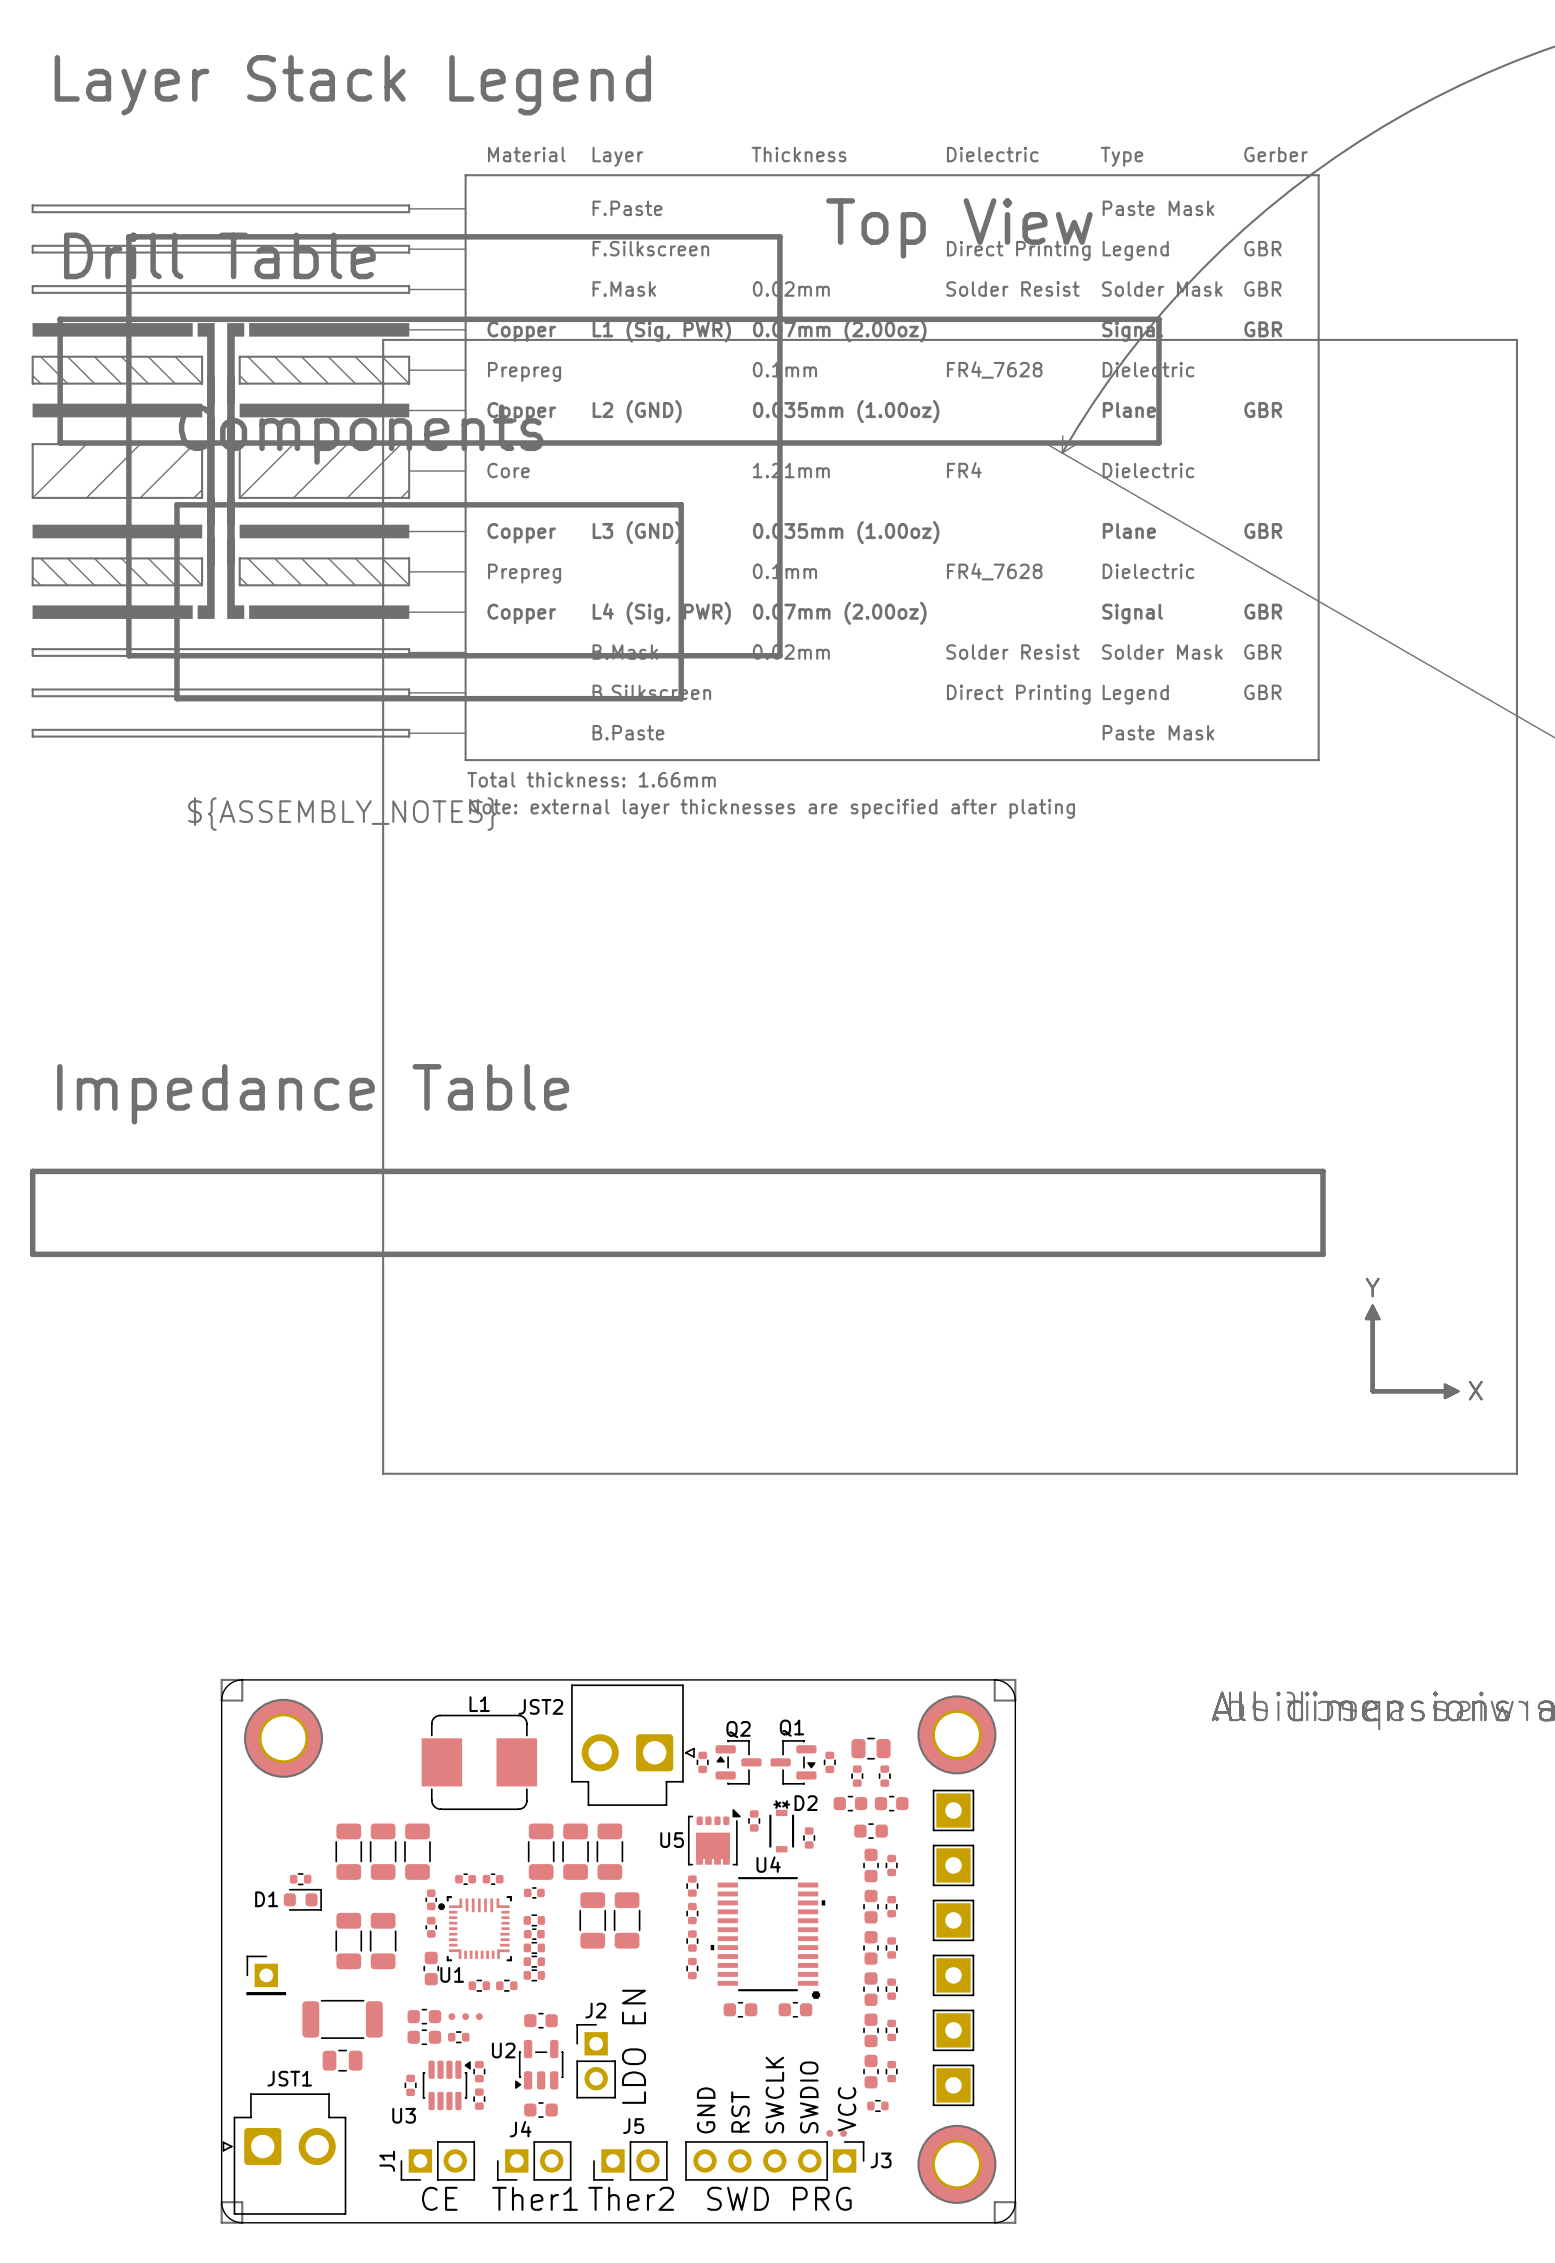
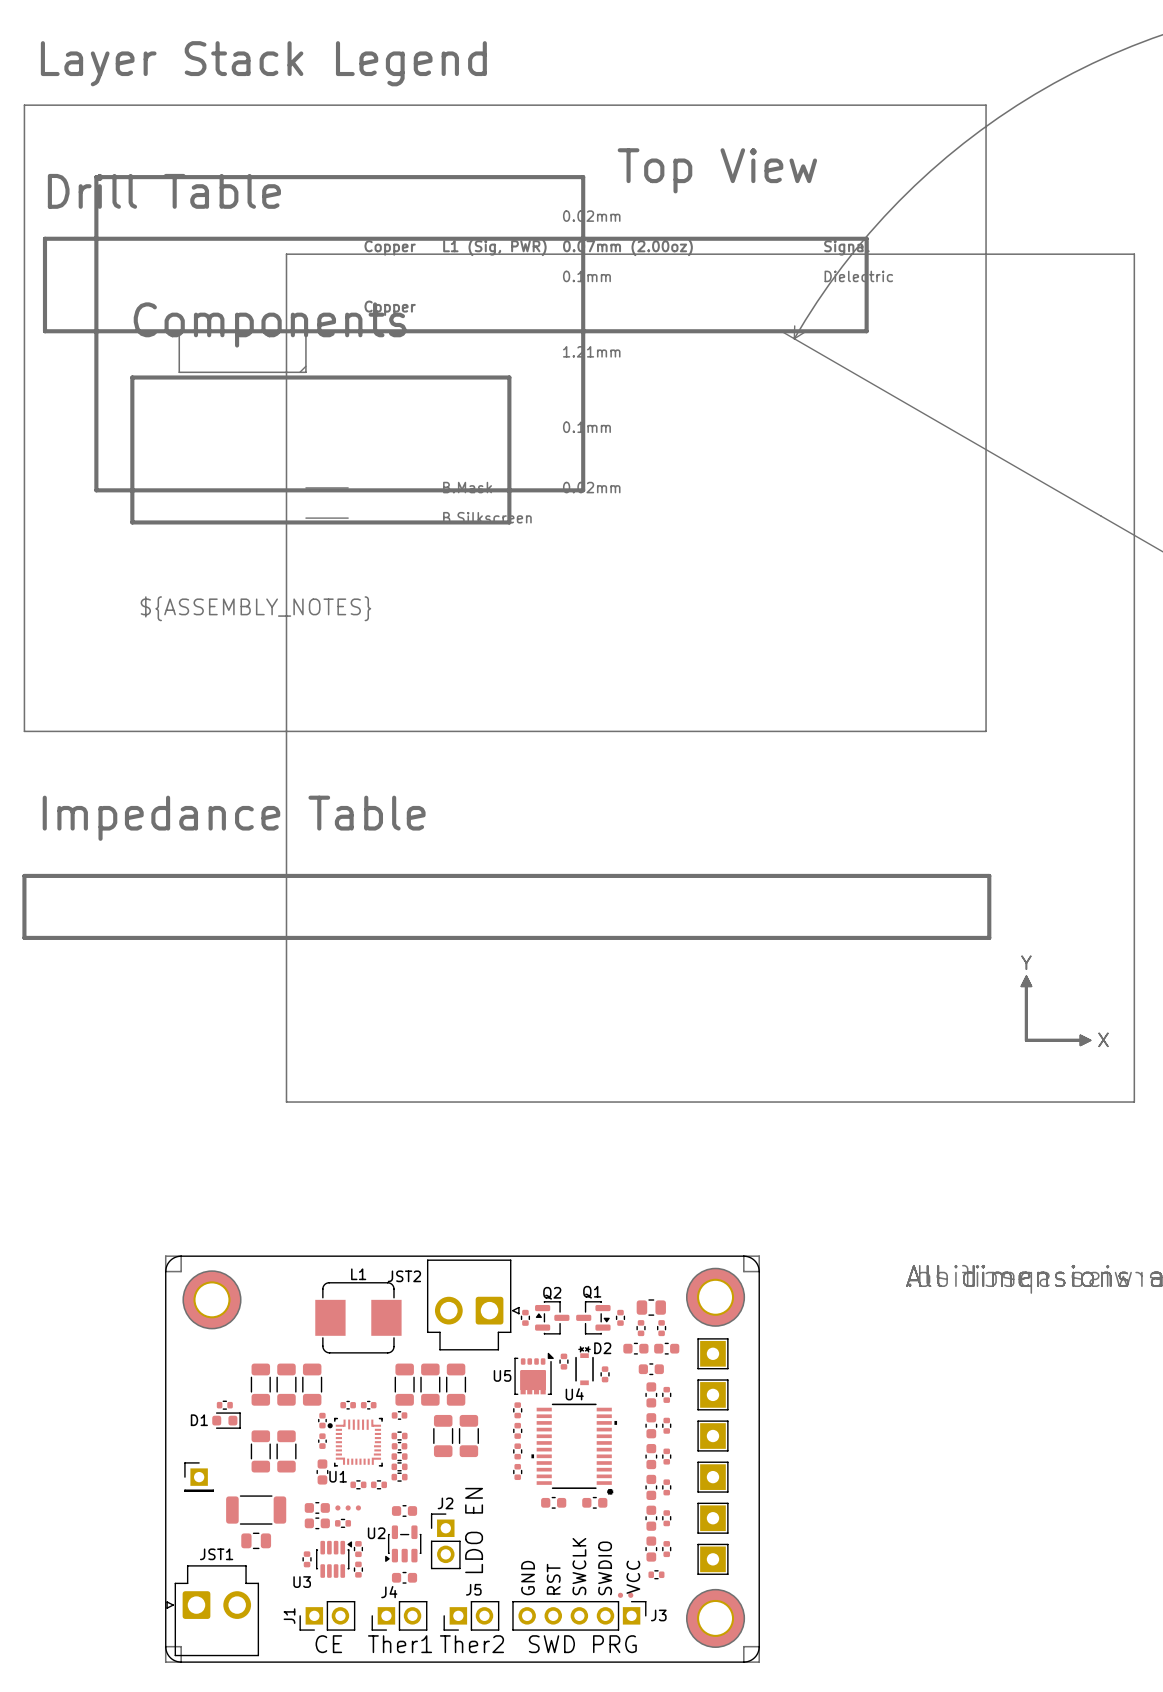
text: Material (526, 154) -> none
text: Thickness (799, 154) -> none
text: Dielectric (992, 154) -> none
text: Gerber (1275, 154) -> none
text: Layer (617, 156) -> none
text: Type (1121, 156) -> none
line: (1318, 175) (465, 175) (465, 760) (1318, 760) -> (24, 550) (24, 731) (986, 731) (986, 568)
line: (32, 205) (409, 205) (409, 212) (32, 212) -> (24, 153) (24, 105) (986, 105) (986, 131)
line: (409, 208) (465, 208) -> none
text: F.Paste (627, 208) -> none
text: Paste Mask (1158, 208) -> none
line: (32, 245) (409, 245) (409, 252) (32, 252) -> (24, 183) (24, 158)
text: F.Silkscreen (650, 248) -> none
text: GBR (1262, 248) -> none
line: (409, 249) (465, 249) -> none
text: Direct Printing (1018, 250) -> none
text: Legend (1135, 250) -> none
line: (32, 286) (409, 286) (409, 292) (32, 292) -> (24, 213) (24, 188)
line: (409, 289) (465, 289) -> none
text: F.Mask (624, 289) -> none
text: Solder Resist (1012, 289) -> none
text: Solder Mask (1162, 289) -> none
text: GBR (1262, 289) -> none
drawing: [32, 323, 410, 619] -> none
line: (409, 329) (465, 329) -> none
text: GBR (1263, 329) -> none
line: (32, 356) (202, 356) (202, 383) -> (24, 266) (24, 218)
line: (40, 356) (67, 383) -> none
line: (67, 356) (94, 383) -> none
line: (94, 356) (121, 383) -> none
line: (121, 356) (148, 383) -> none
line: (148, 356) (175, 383) -> none
line: (175, 356) (202, 383) -> none
line: (247, 356) (274, 383) -> none
line: (274, 356) (301, 383) -> none
line: (301, 356) (328, 383) -> none
line: (328, 356) (355, 383) -> none
line: (355, 356) (382, 383) -> none
line: (382, 356) (409, 383) -> none
text: FR4_7628 (994, 369) -> none
line: (409, 370) (465, 370) -> none
text: Prepreg (524, 371) -> none
line: (32, 375) (40, 383) -> none
line: (239, 375) (247, 383) -> none
line: (32, 383) (202, 383) -> none
line: (409, 383) (409, 356) (239, 356) (239, 383) (409, 383) -> none
line: (409, 410) (465, 410) -> none
text: Plane (1129, 410) -> none
text: GBR (1263, 410) -> none
text: L2 (GND) (637, 411) -> none
text: 0.035mm (1.00oz) (846, 411) -> none
line: (32, 444) (202, 444) (202, 497) (32, 497) (86, 444) -> (24, 332) (24, 286)
line: (140, 444) (86, 497) -> none
line: (194, 444) (140, 497) -> none
line: (293, 444) (239, 497) -> none
line: (347, 444) (293, 497) -> none
line: (401, 444) (347, 497) -> none
text: Core (508, 470) -> none
text: FR4 (964, 470) -> none
text: Dielectric (1148, 470) -> none
line: (409, 471) (465, 471) -> none
line: (202, 489) (194, 497) -> none
line: (409, 531) (465, 531) -> none
text: Plane (1129, 531) -> none
text: GBR (1263, 531) -> none
text: L3 (GND) (637, 532) -> none
text: 0.035mm (1.00oz) (846, 532) -> none
text: Copper (521, 533) -> none
line: (32, 558) (202, 558) (202, 585) -> (24, 417) (24, 372)
line: (40, 558) (67, 585) -> none
line: (67, 558) (94, 585) -> none
line: (94, 558) (121, 585) -> none
line: (121, 558) (148, 585) -> none
line: (148, 558) (175, 585) -> none
line: (175, 558) (202, 585) -> none
line: (247, 558) (274, 585) -> none
line: (274, 558) (301, 585) -> none
line: (301, 558) (328, 585) -> none
line: (328, 558) (355, 585) -> none
line: (355, 558) (382, 585) -> none
line: (382, 558) (409, 585) -> none
line: (409, 571) (465, 571) -> none
text: FR4_7628 (994, 571) -> none
text: Dielectric (1148, 571) -> none
text: Prepreg (524, 573) -> none
line: (32, 577) (40, 585) -> none
line: (239, 577) (247, 585) -> none
line: (32, 585) (202, 585) -> (24, 437) (24, 485)
line: (409, 585) (409, 558) (239, 558) (239, 585) (409, 585) -> none
text: GBR (1263, 611) -> none
line: (409, 612) (465, 612) -> none
text: Copper (521, 613) -> none
text: L4 (Sig, PWR) (661, 613) -> none
text: 0.07mm (2.00oz) (839, 613) -> none
text: Signal (1132, 613) -> none
line: (32, 649) (409, 649) (409, 655) (32, 655) -> (24, 515) (24, 490)
text: Solder Resist (1012, 652) -> none
text: Solder Mask (1162, 652) -> none
text: GBR (1262, 652) -> none
line: (32, 689) (409, 689) (409, 696) (32, 696) -> none
text: GBR (1262, 692) -> none
text: Direct Printing (1018, 694) -> none
text: Legend (1135, 694) -> none
line: (32, 729) (409, 729) (409, 736) (32, 736) -> (24, 545) (24, 520)
text: B.Paste (628, 732) -> none
text: Paste Mask (1158, 732) -> none
line: (409, 733) (465, 733) -> none
text: Total thickness: 1.66mm (591, 779) -> none
text: Note: external layer thicknesses are specified after plating (772, 808) -> none

